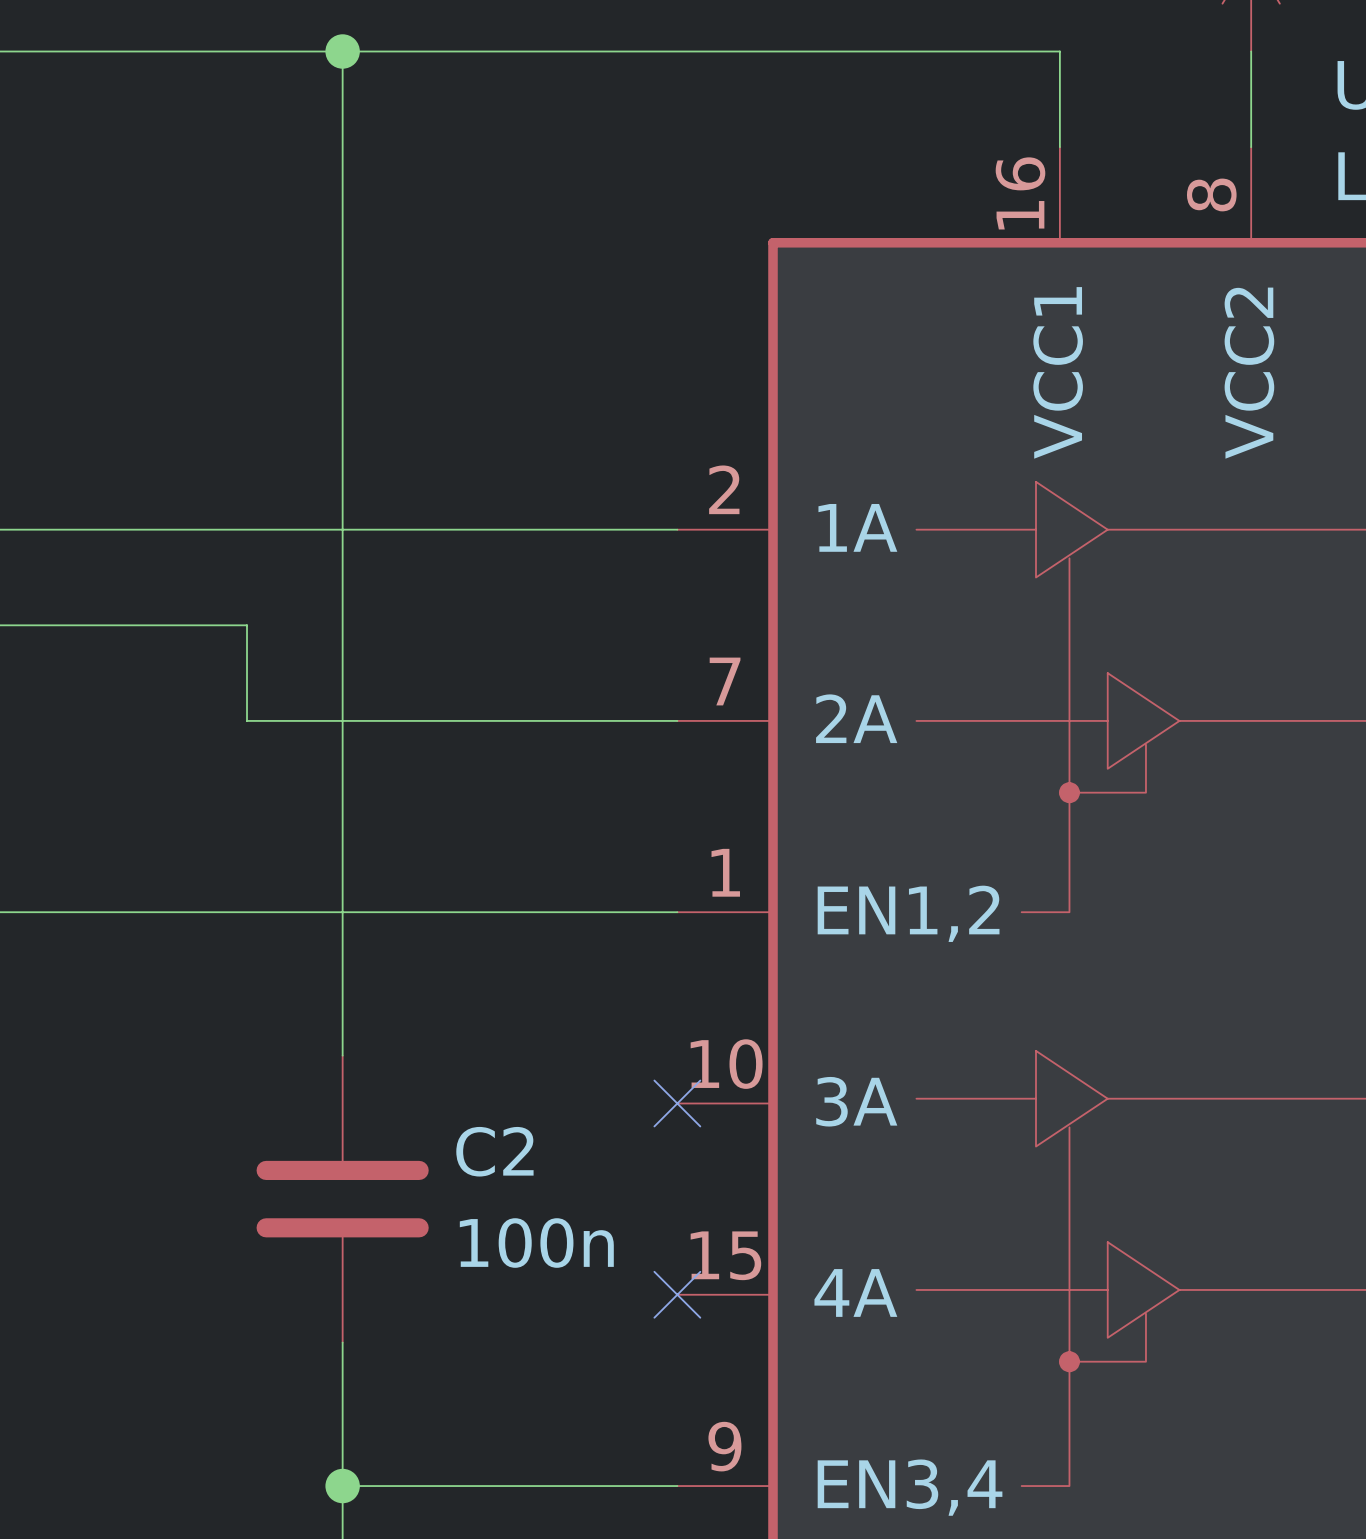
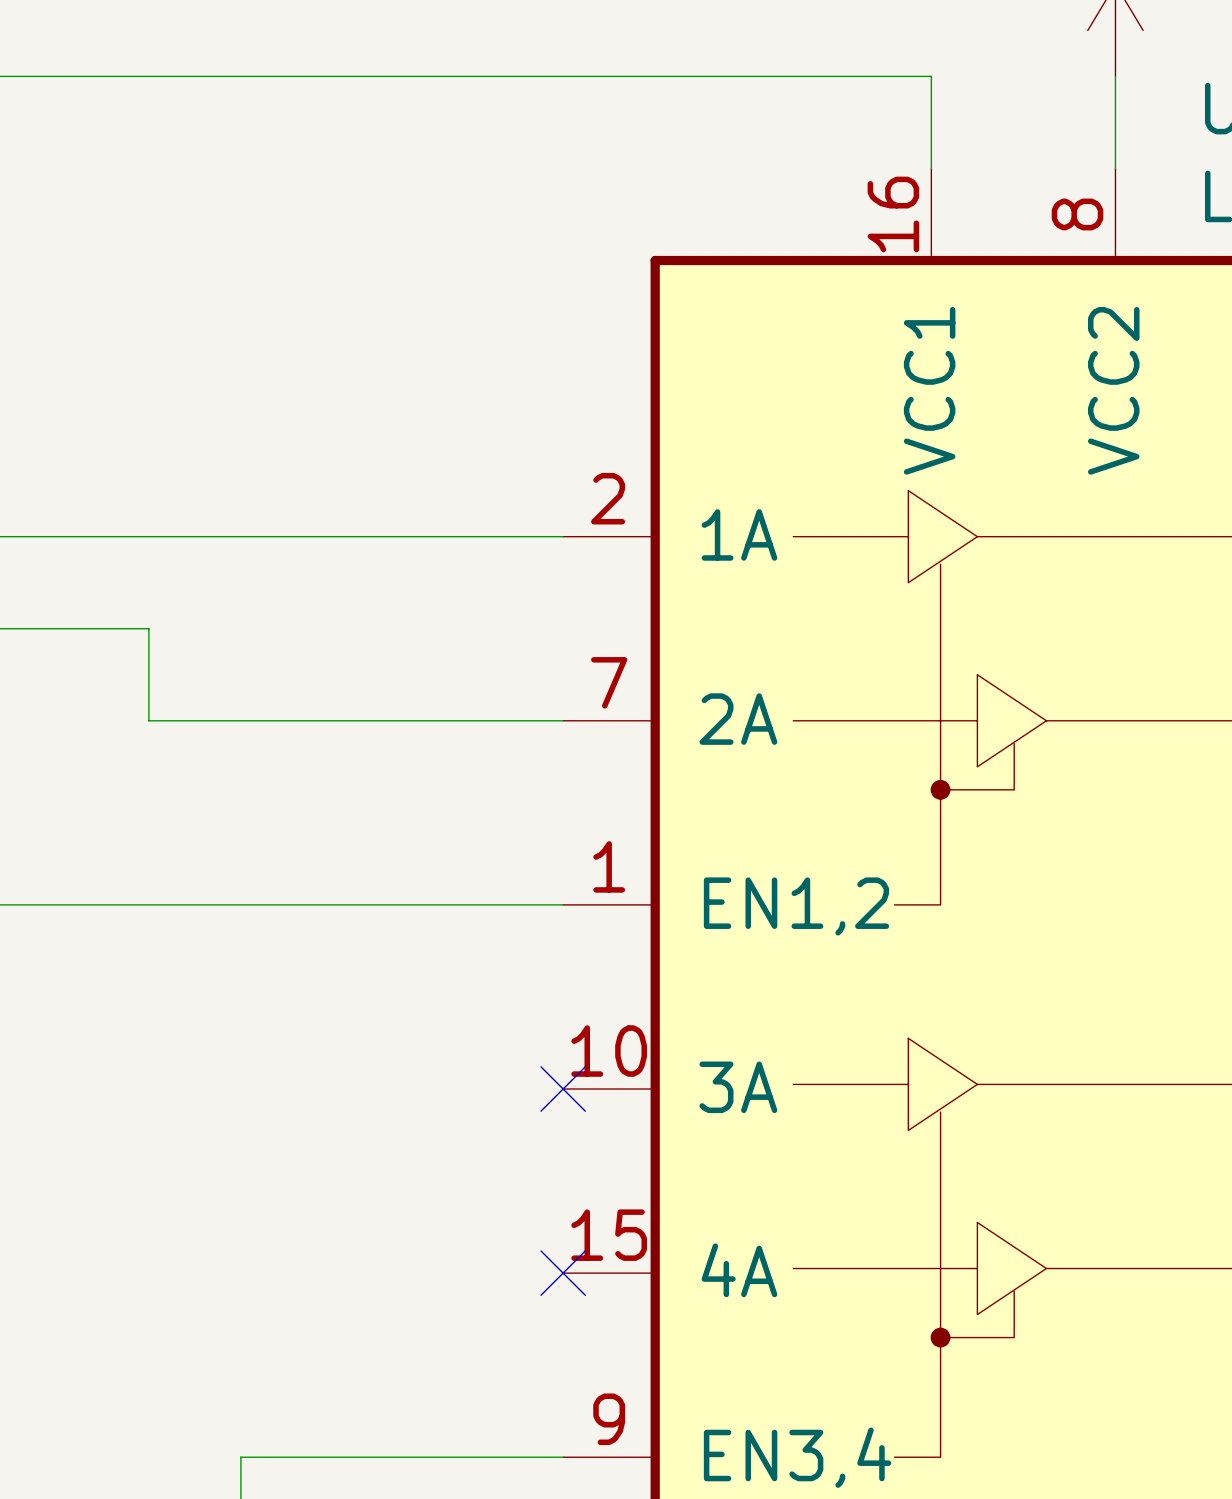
wire: (342, 51) (342, 1055) -> none
junction: (342, 51) -> none
C2: 100n (342, 1199) -> none
wire: (342, 1342) (342, 1486) -> none
junction: (342, 1486) -> none

